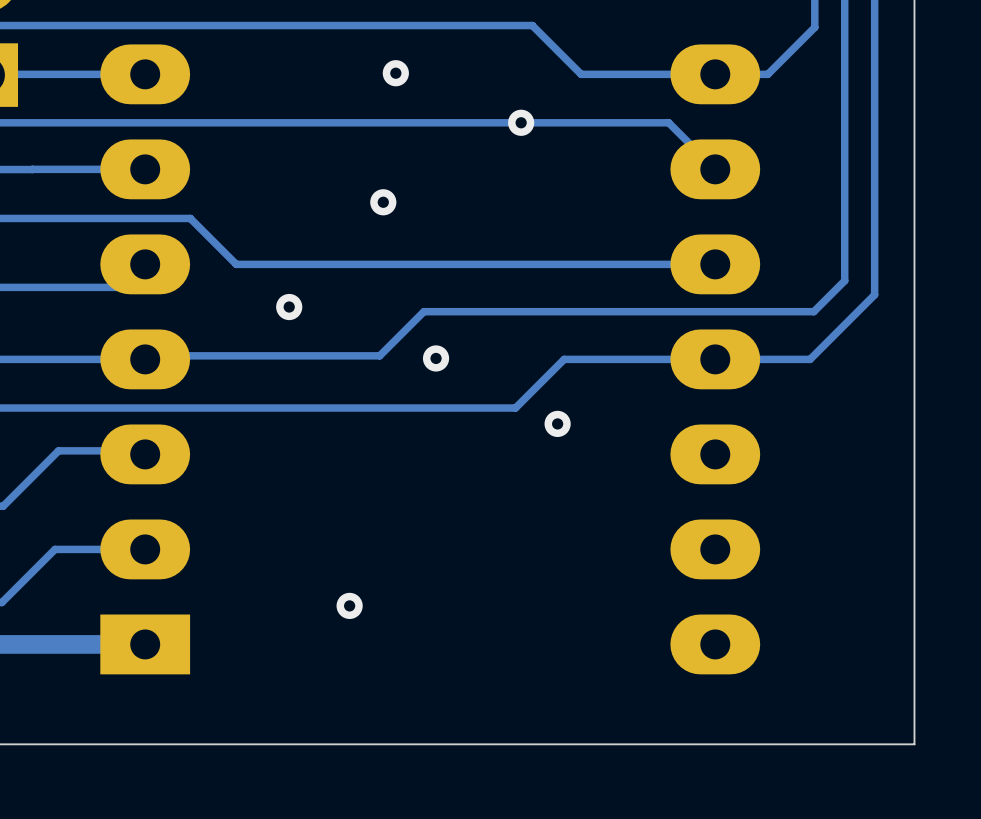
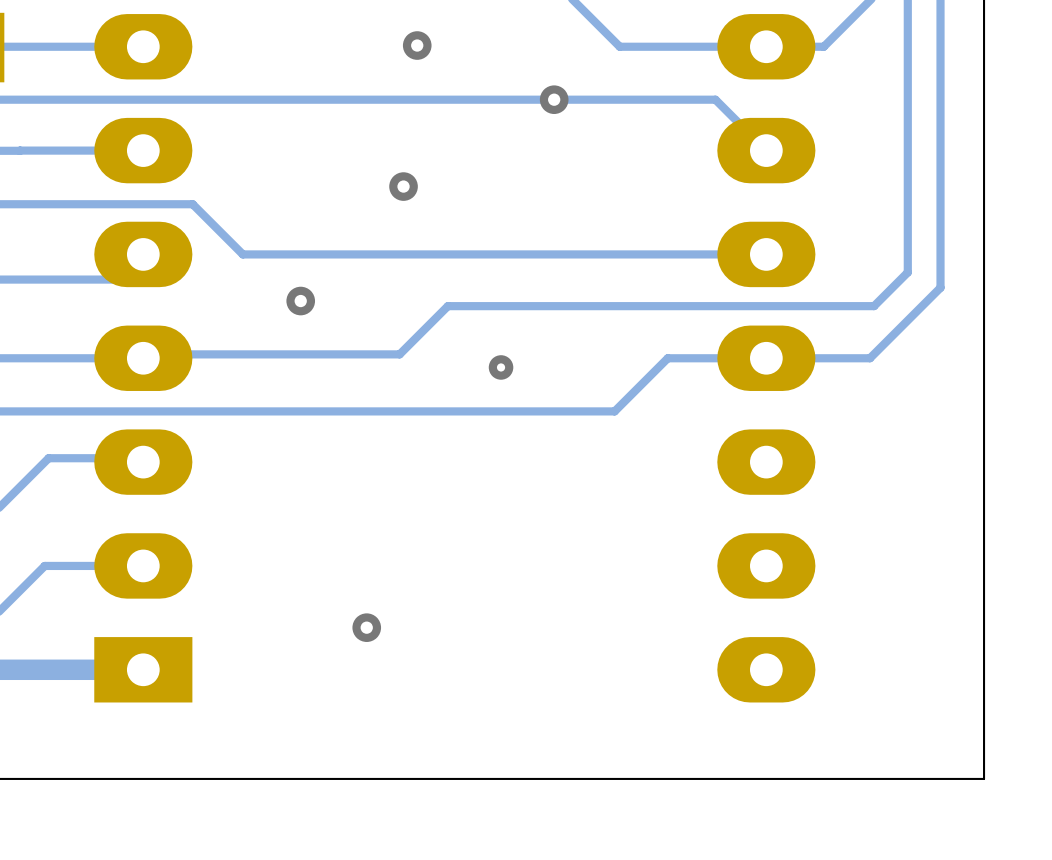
via: (436, 358) -> none
track: (625, 359) (564, 359) (515, 408) -> (667, 358) (614, 411) (548, 411)
via: none -> (501, 367)
via: (557, 423) -> none

